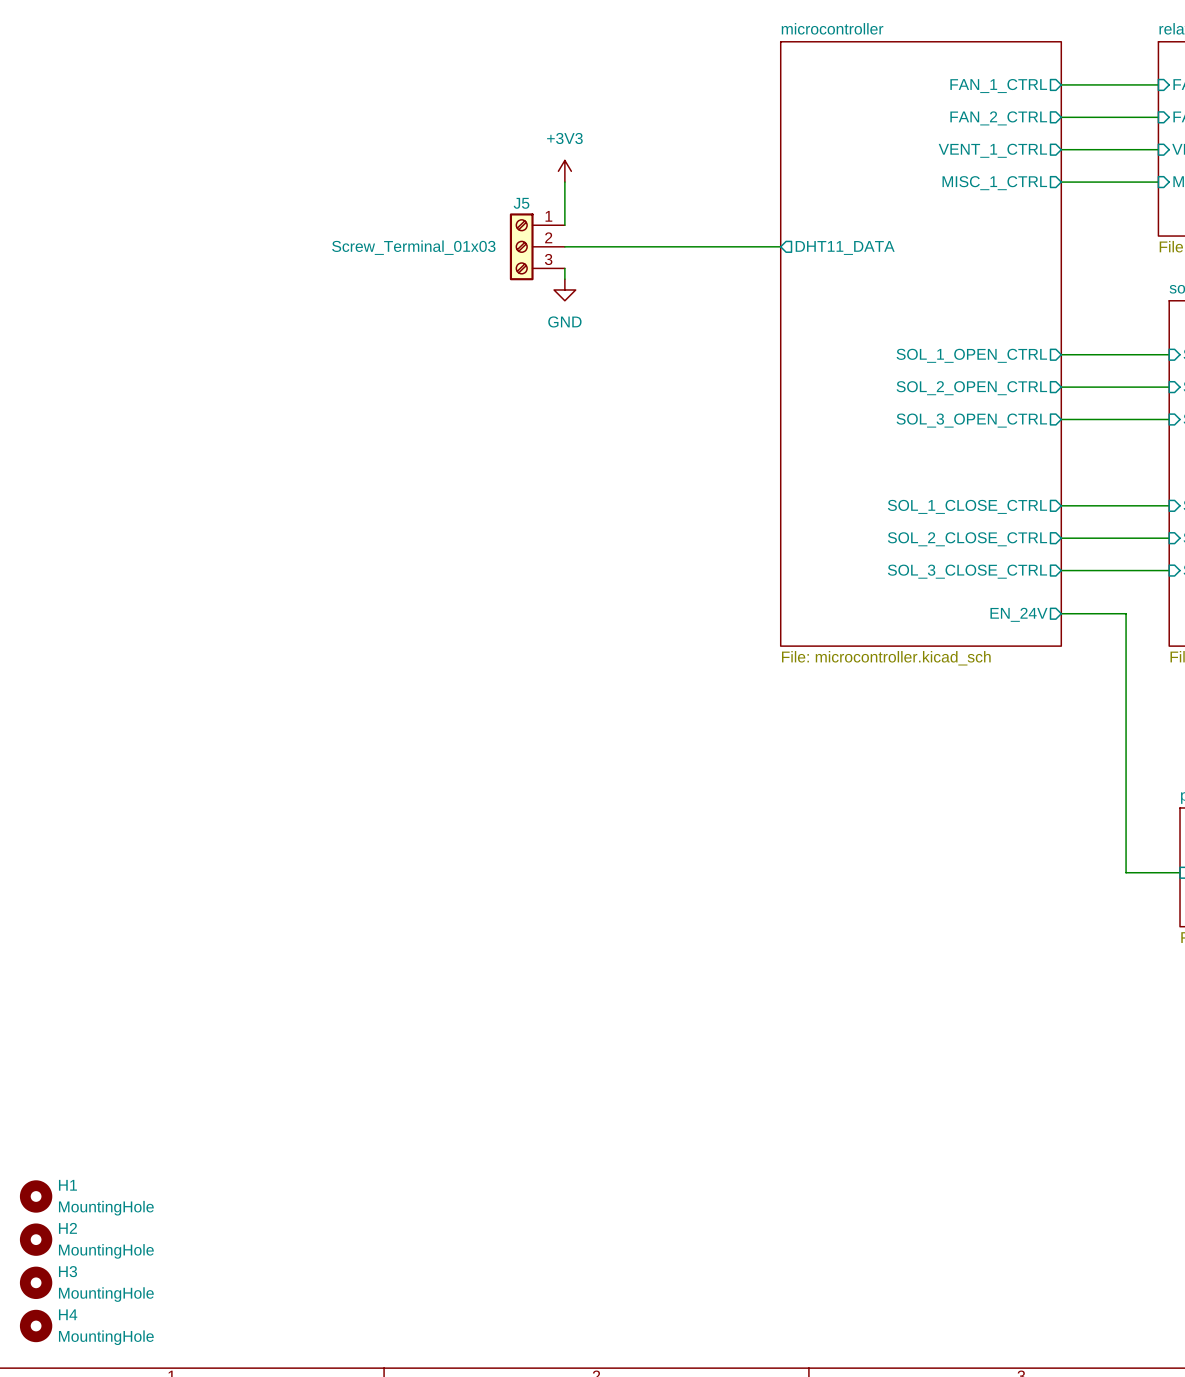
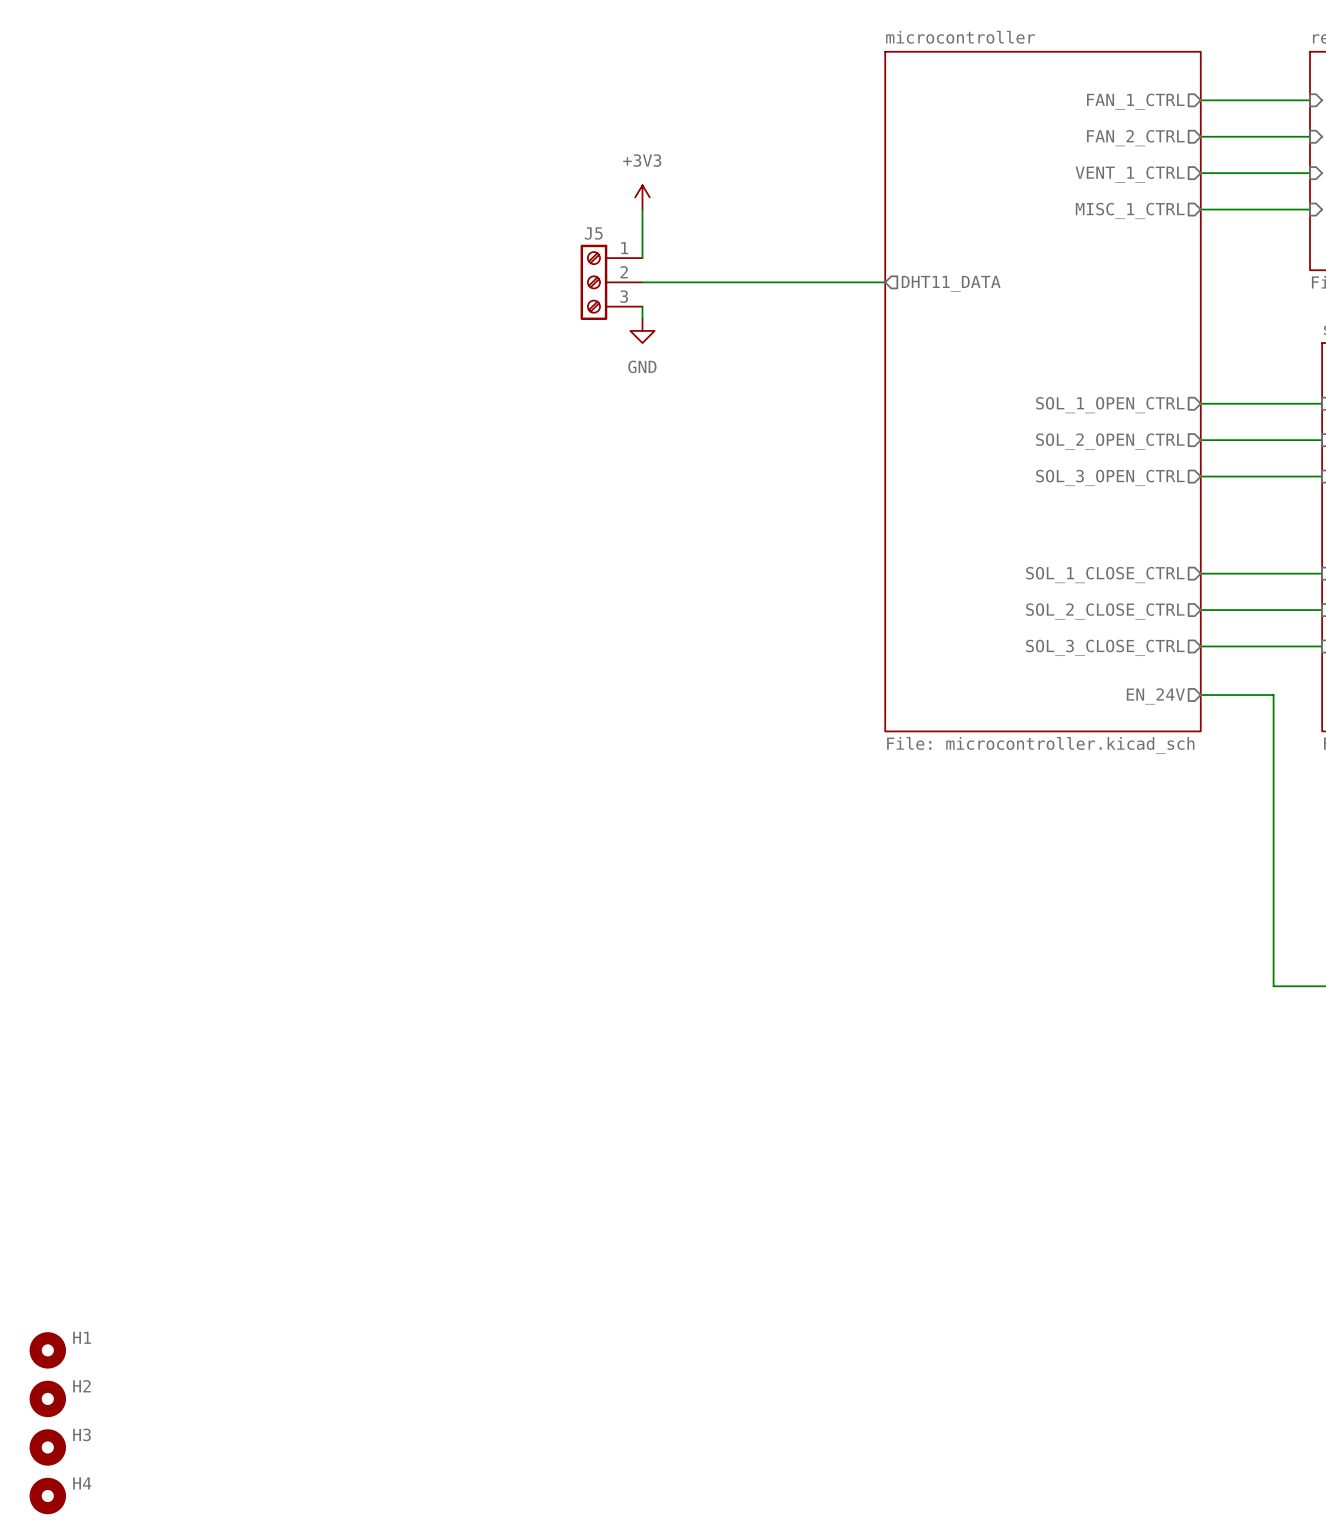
J5 value: Screw_Terminal_01x03 (413, 247) -> none
H1 value: MountingHole (106, 1208) -> none
H2 value: MountingHole (106, 1251) -> none
H3 value: MountingHole (106, 1294) -> none
H4 value: MountingHole (106, 1337) -> none

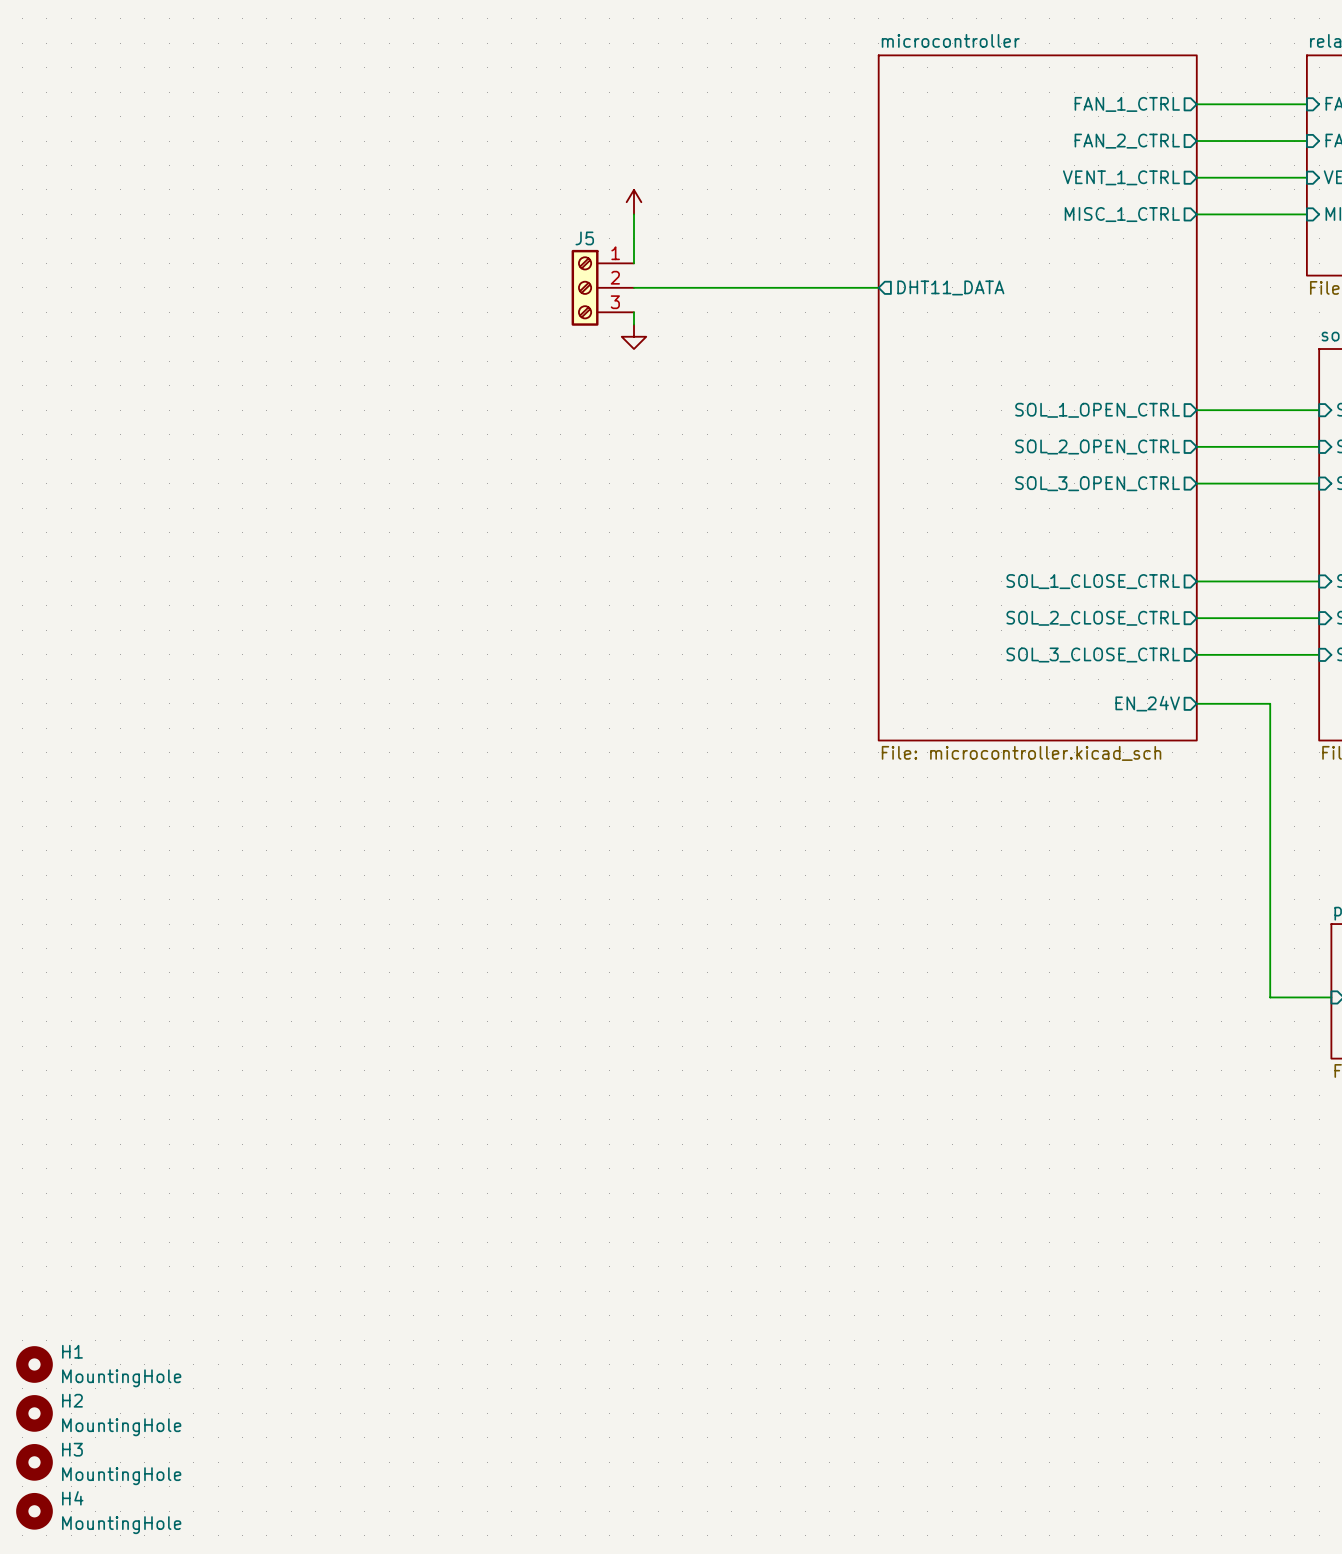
power symbol text: +3V3 (642, 160) -> none
power symbol text: GND (642, 366) -> none
H1 value: none -> MountingHole (121, 1378)
H2 value: none -> MountingHole (121, 1427)
H3 value: none -> MountingHole (121, 1476)
H4 value: none -> MountingHole (121, 1525)

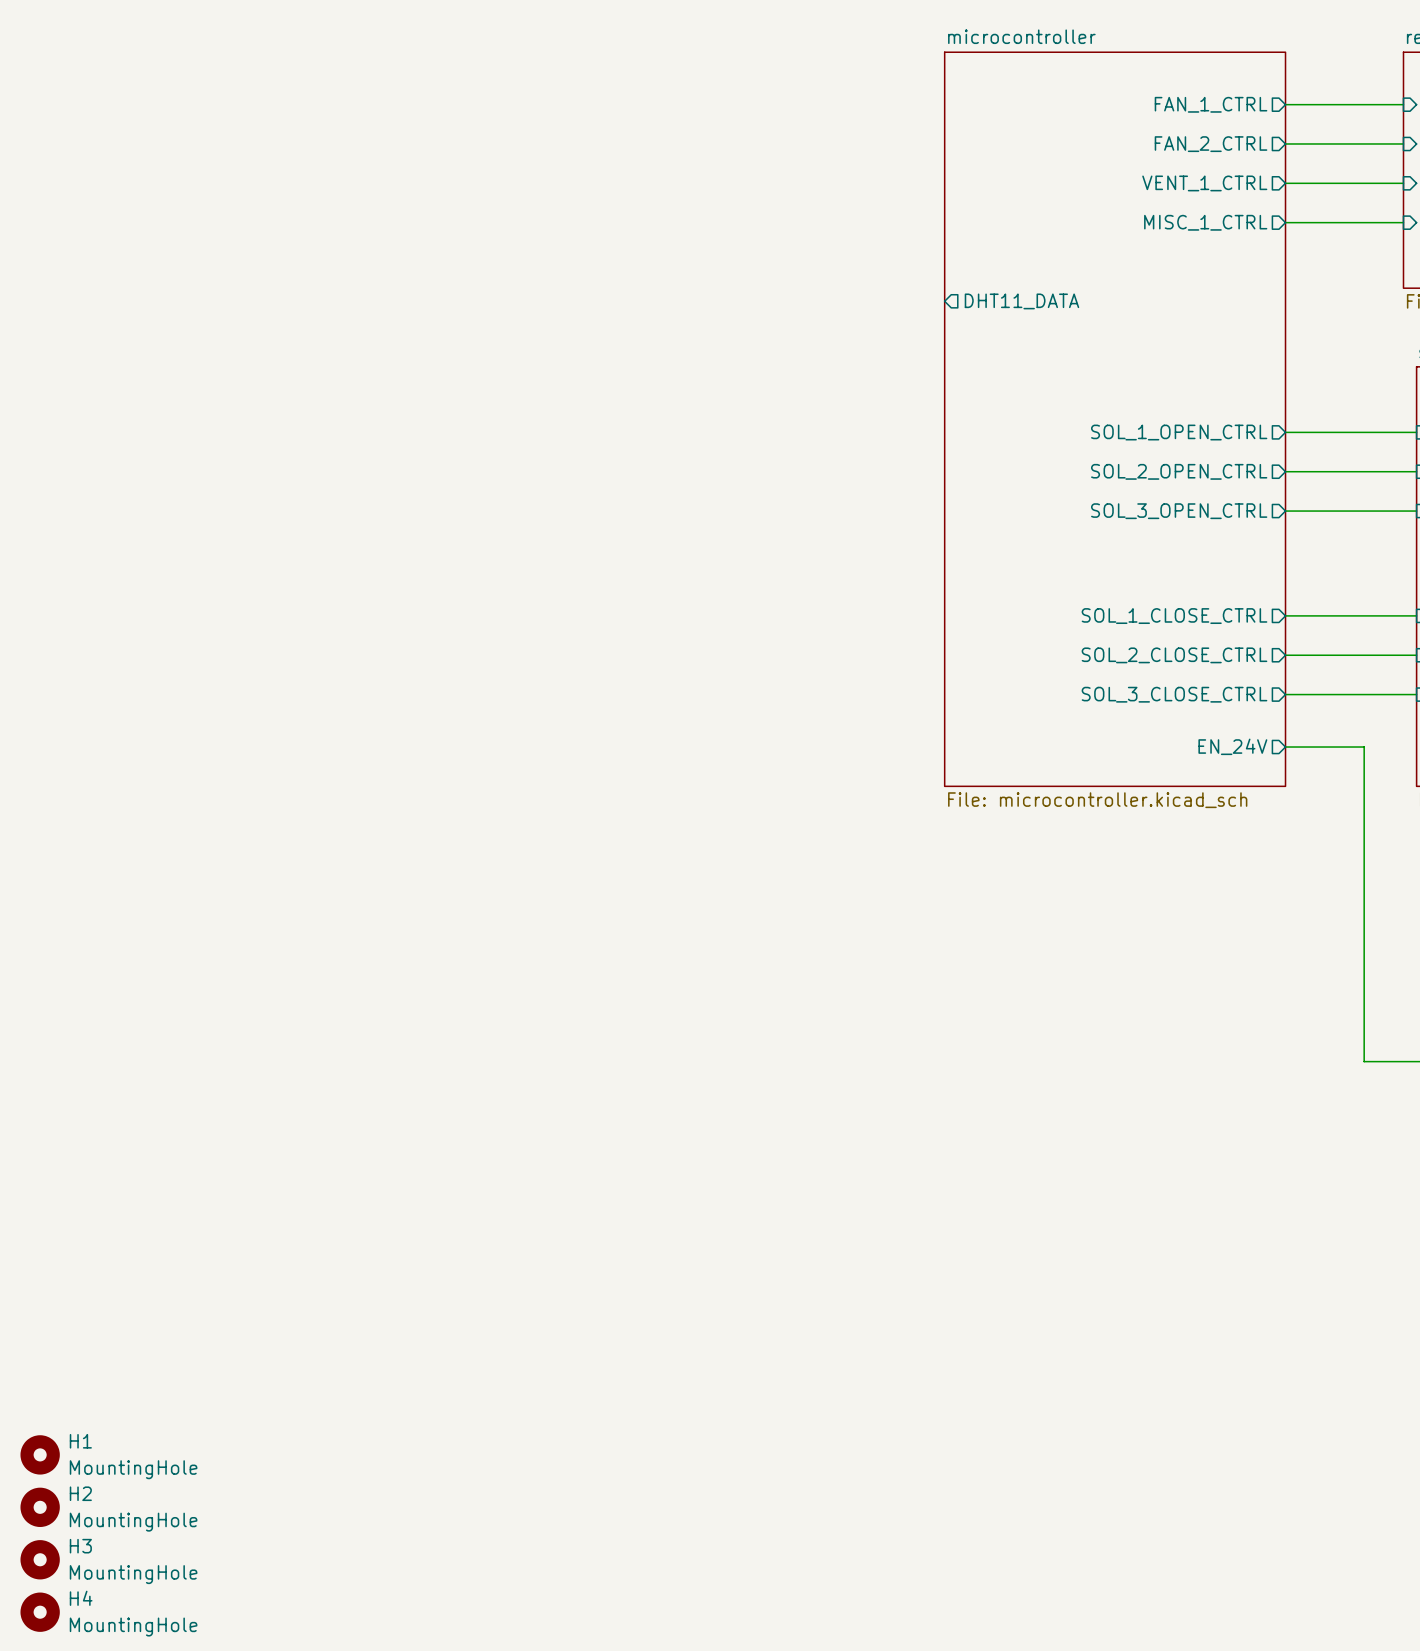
power symbol: (633, 202) -> none
wire: (633, 214) (633, 263) -> none
J5: (602, 287) -> none
wire: (633, 287) (878, 287) -> none
wire: (633, 312) (633, 324) -> none
power symbol: (633, 336) -> none

